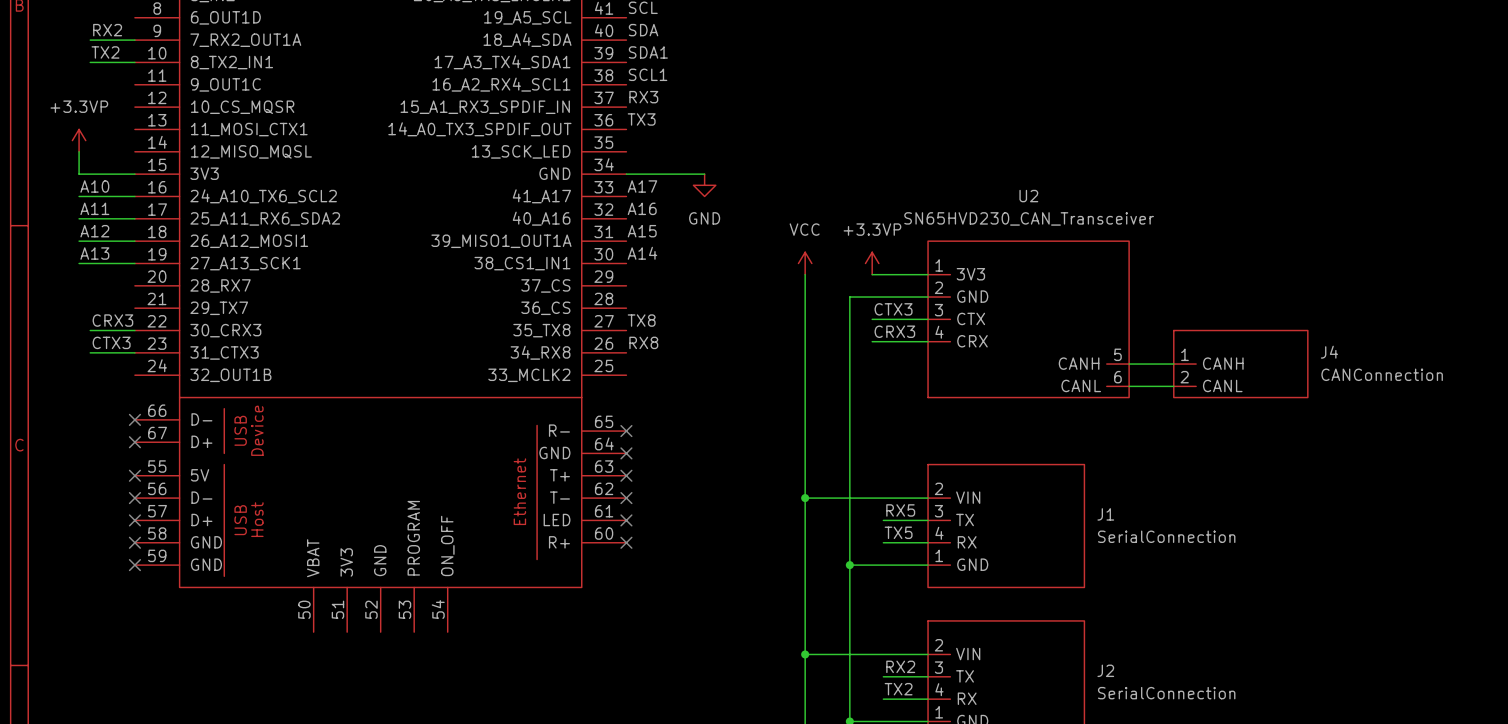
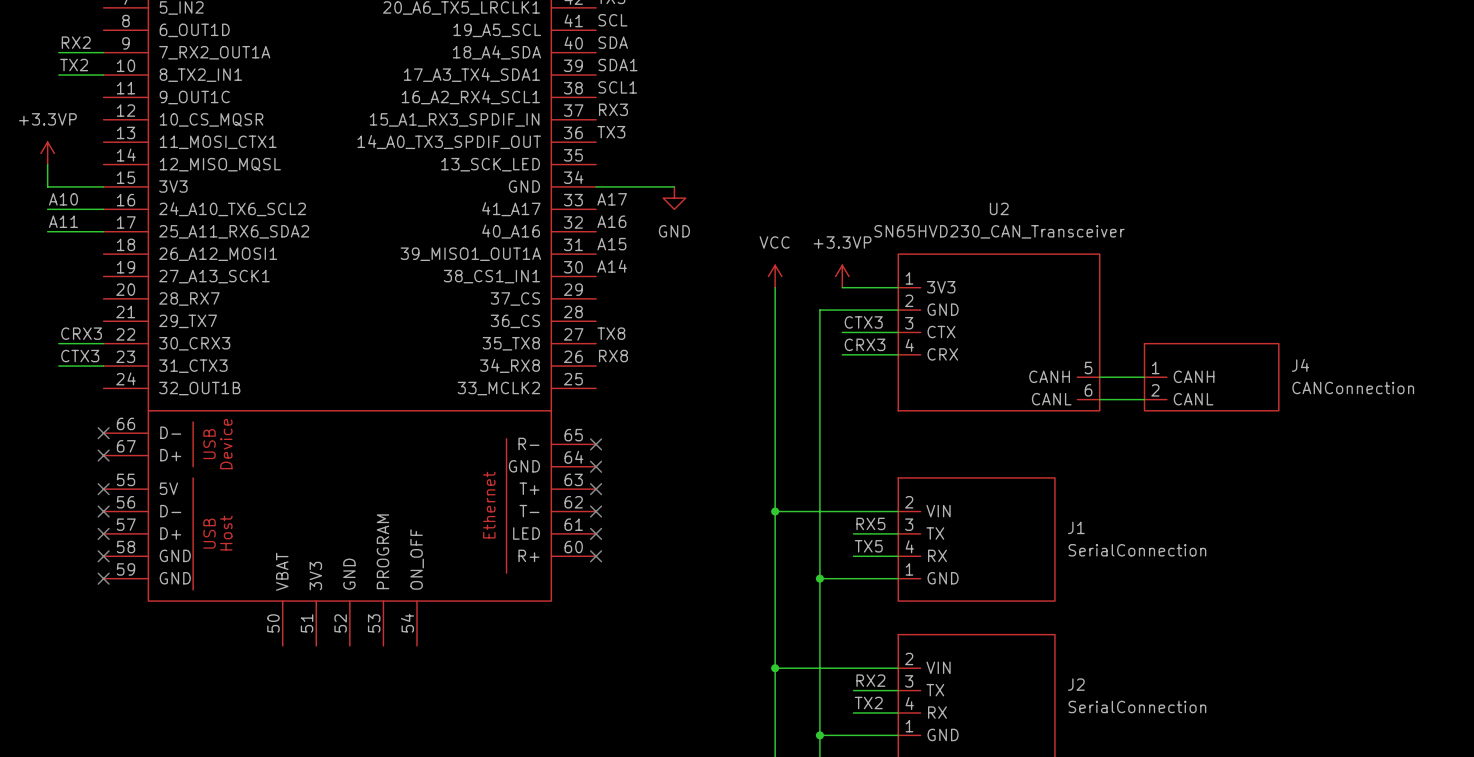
label: A12 (94, 231) -> none
wire: (79, 241) (134, 241) -> none
label: A13 (94, 253) -> none
wire: (79, 263) (134, 263) -> none

